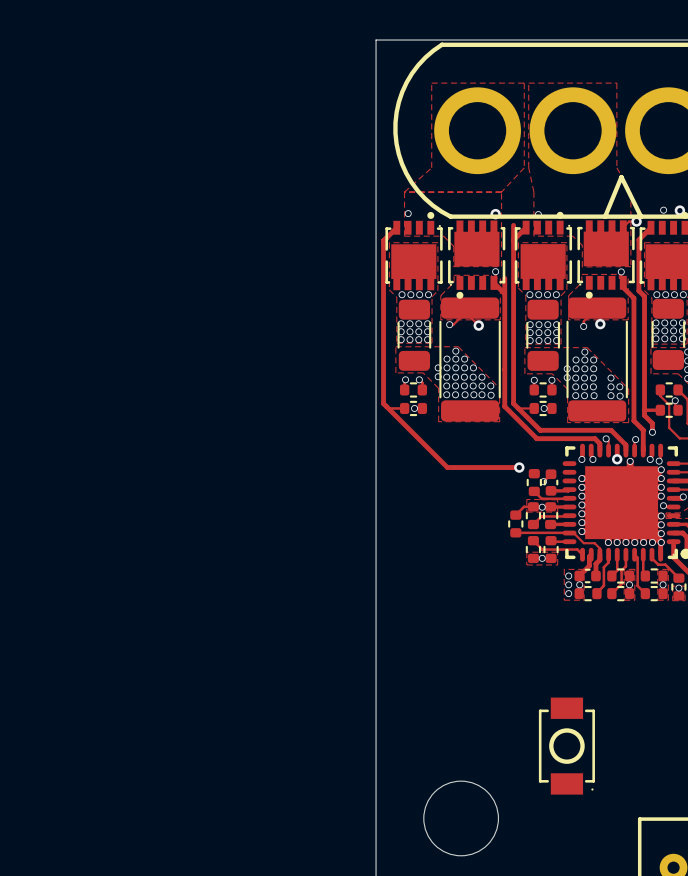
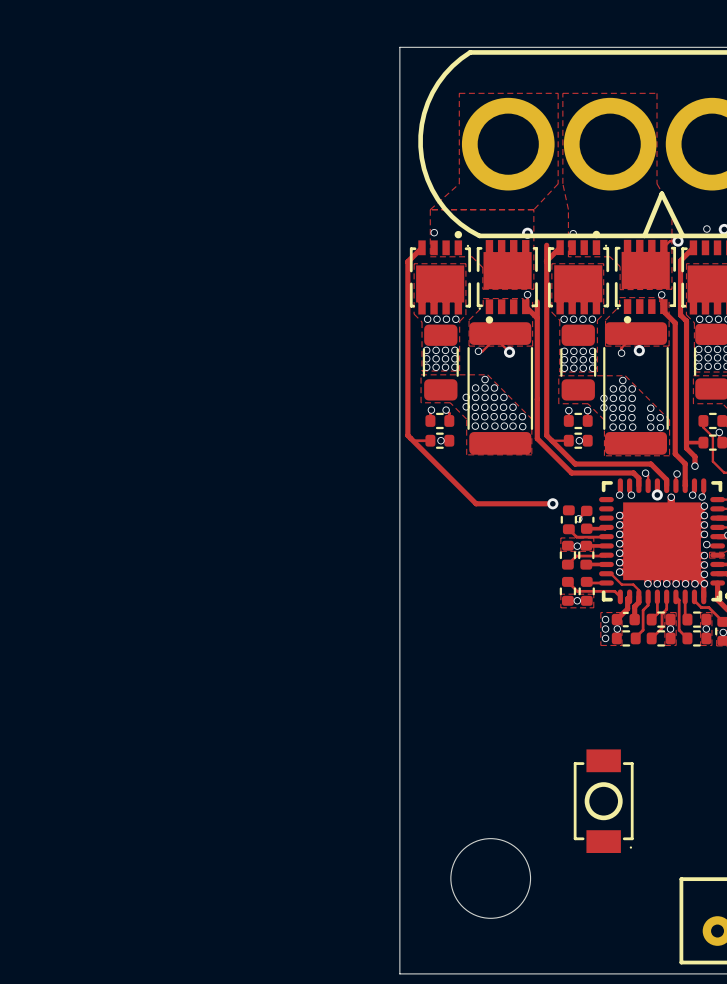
track: (533, 506) (524, 506) (515, 515) -> none
part: (515, 523) -> none
track: (515, 532) (569, 532) -> none

